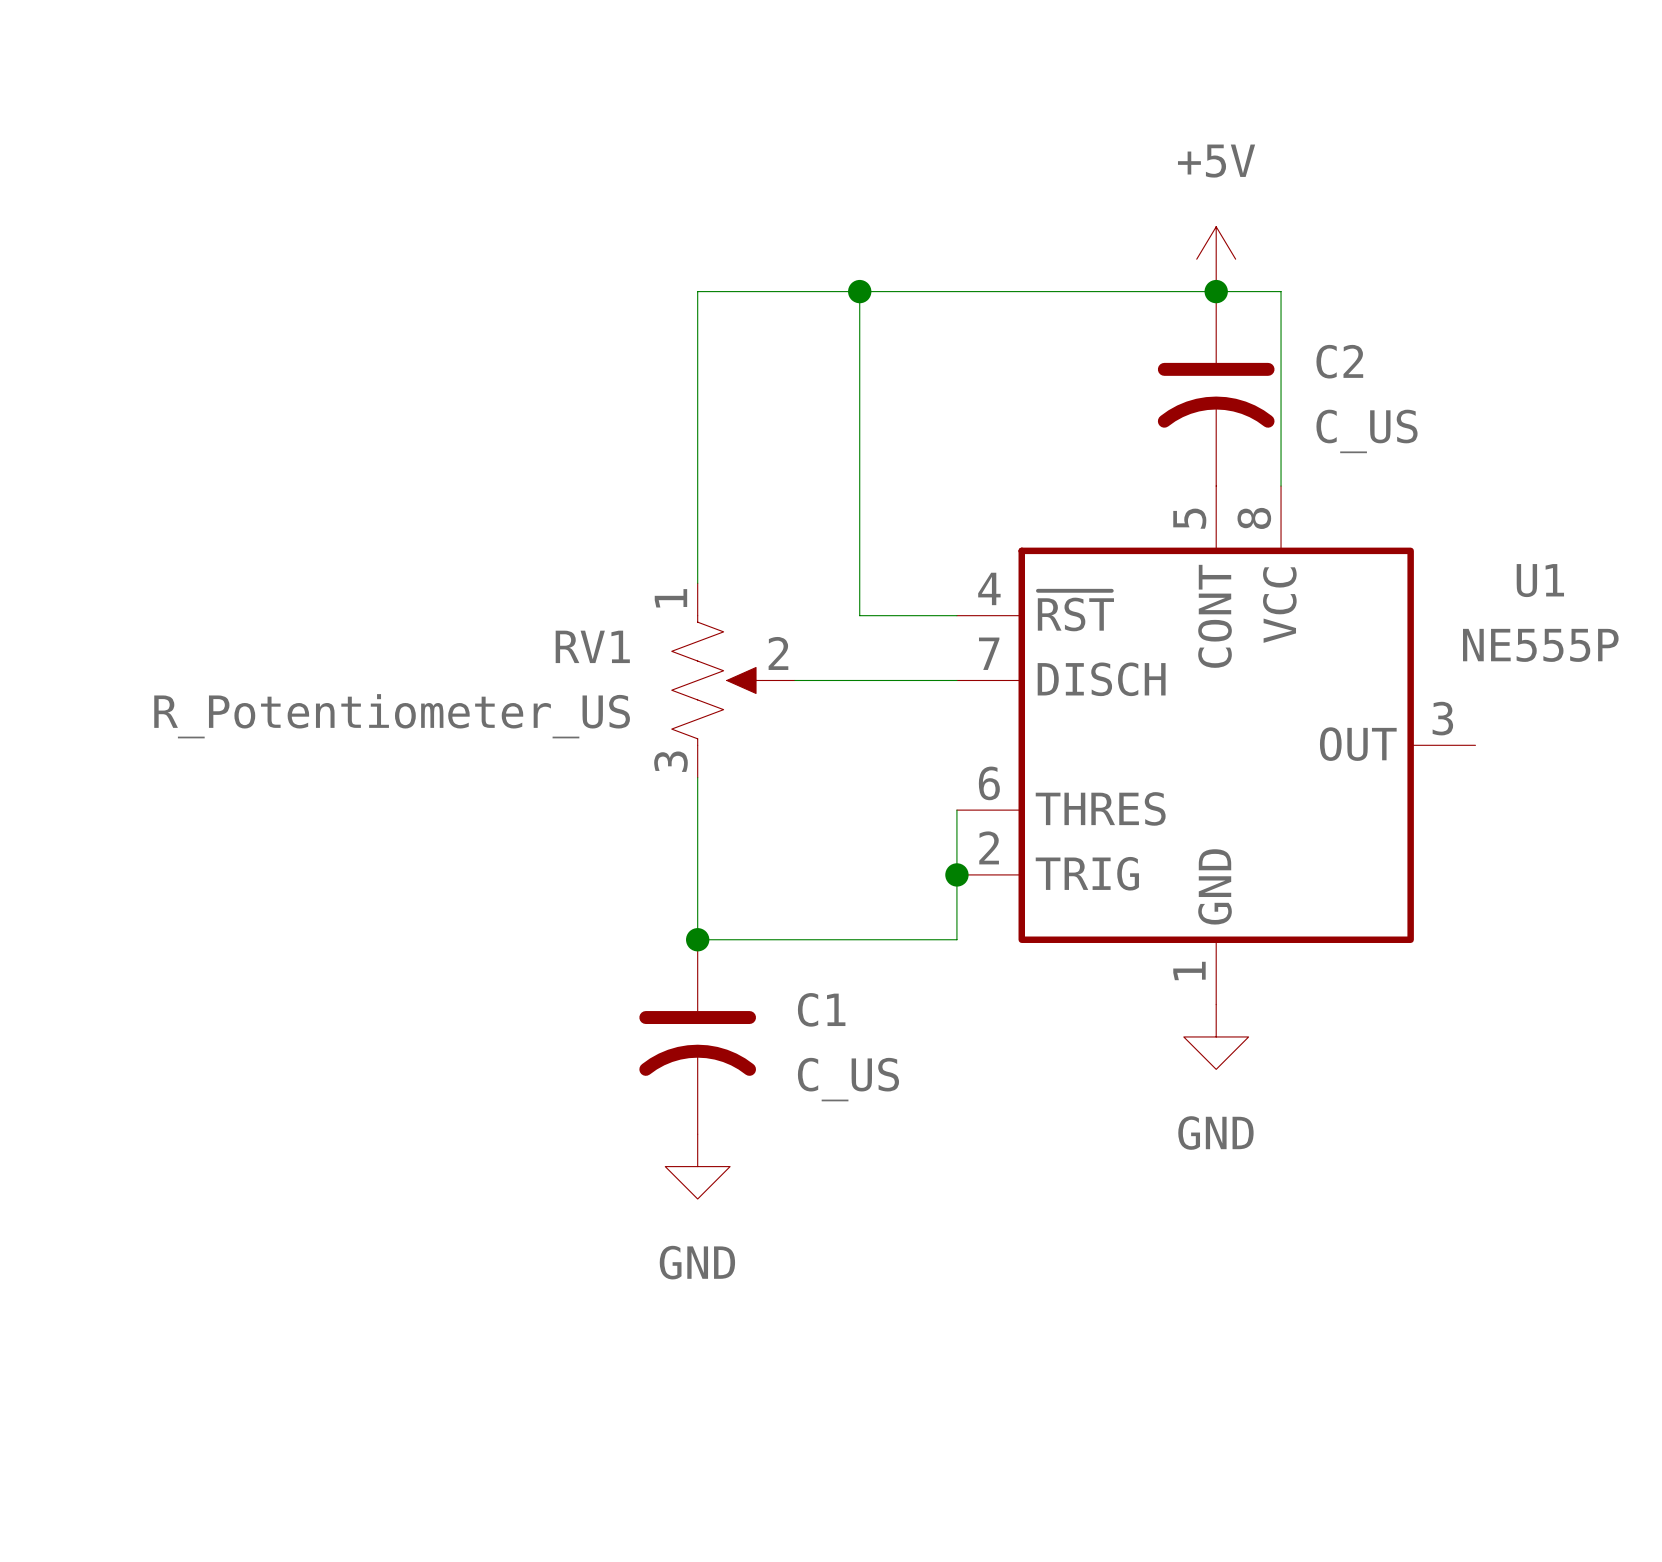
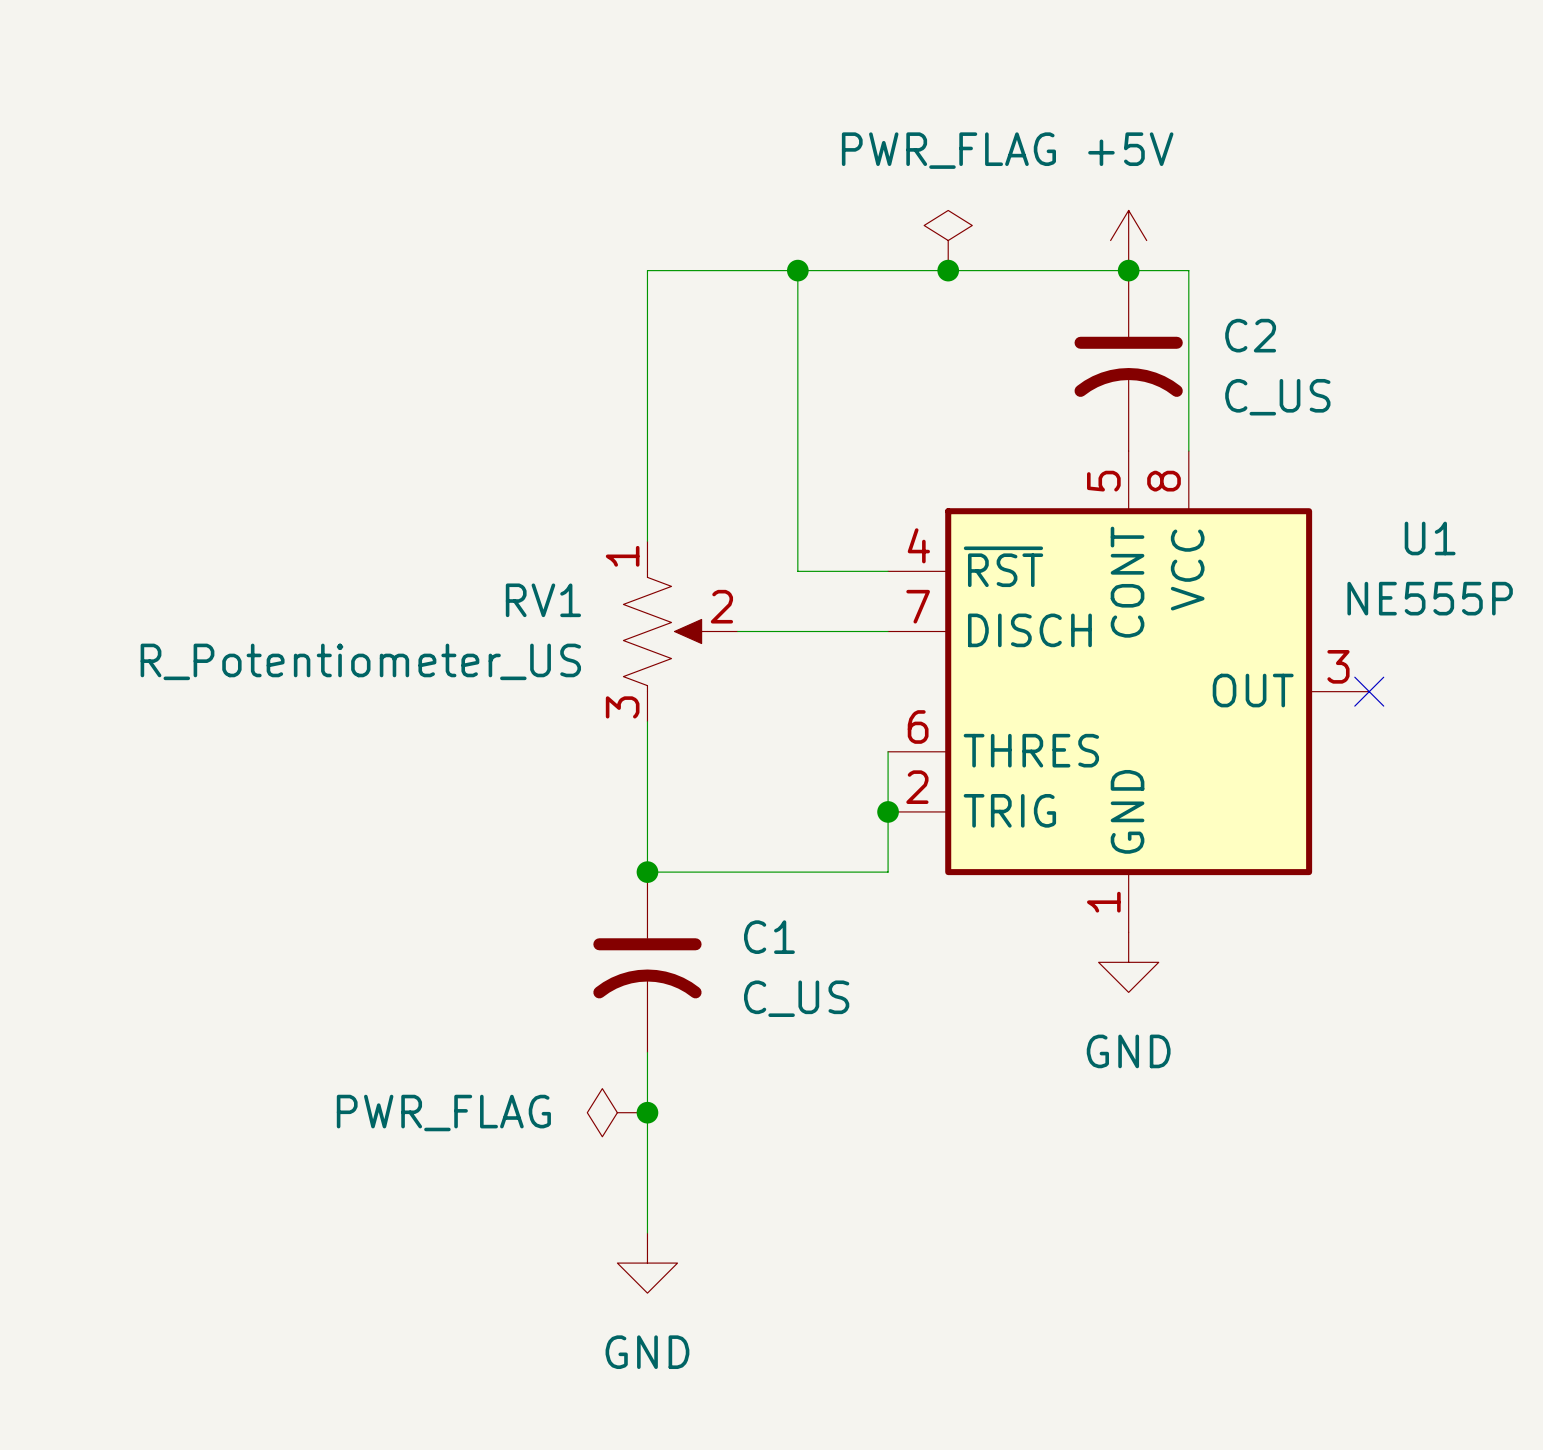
power symbol: none -> PWR_FLAG (948, 240)
junction: none -> (948, 270)
no-connect mark: none -> (1369, 691)
wire: none -> (647, 1052) (647, 1233)
power symbol position: GND (697, 1166) -> GND (647, 1263)
power symbol: none -> PWR_FLAG (617, 1112)
junction: none -> (647, 1112)

